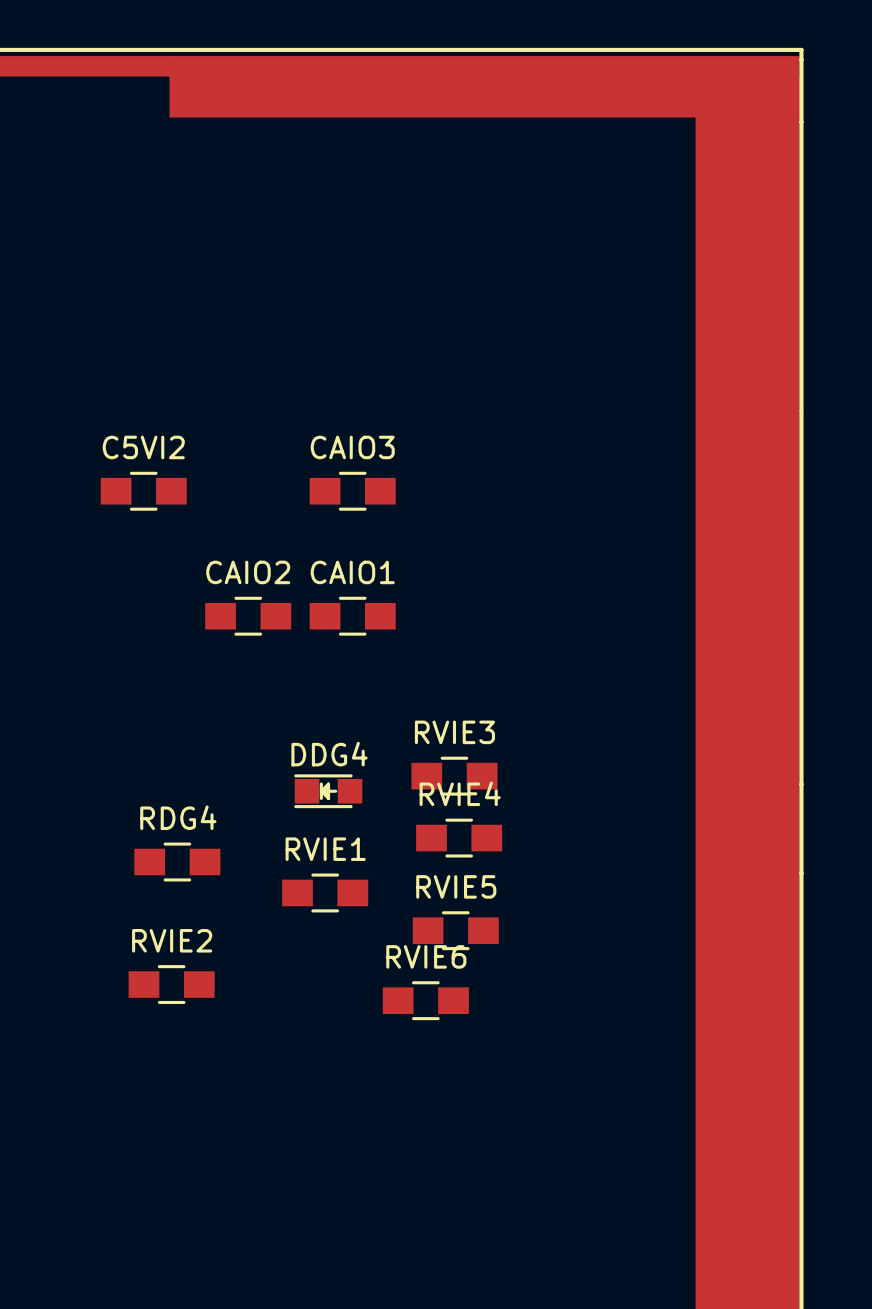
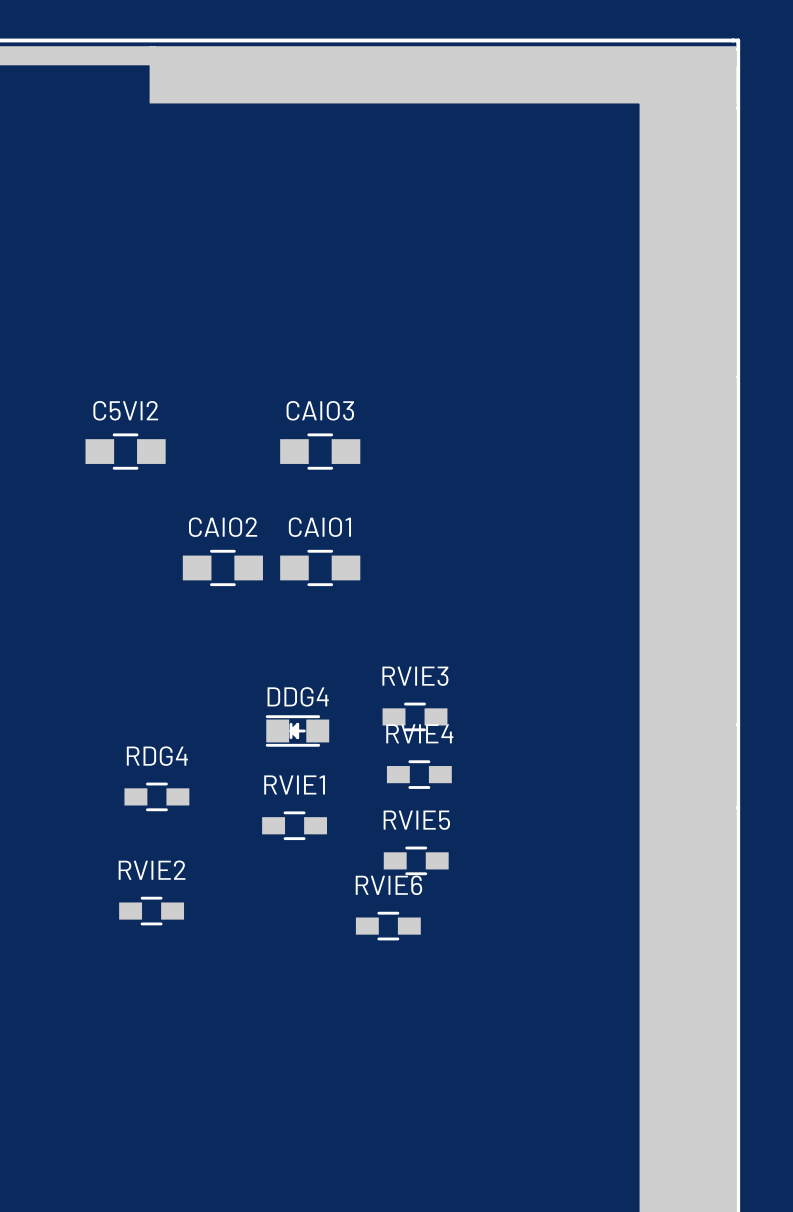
RVIE3 footprint: [411, 756, 498, 796] -> [382, 702, 448, 732]
RVIE4 footprint: [416, 818, 503, 858] -> [386, 760, 452, 789]
RDG4 footprint: [134, 842, 221, 882] -> [124, 782, 190, 812]
RVIE1 footprint: [282, 873, 369, 913] -> [262, 811, 328, 841]
RVIE5 footprint: [412, 911, 499, 951] -> [383, 846, 449, 876]
RVIE2 footprint: [128, 965, 215, 1005] -> [119, 896, 185, 926]
RVIE6 footprint: [382, 981, 469, 1021] -> [355, 911, 421, 941]

